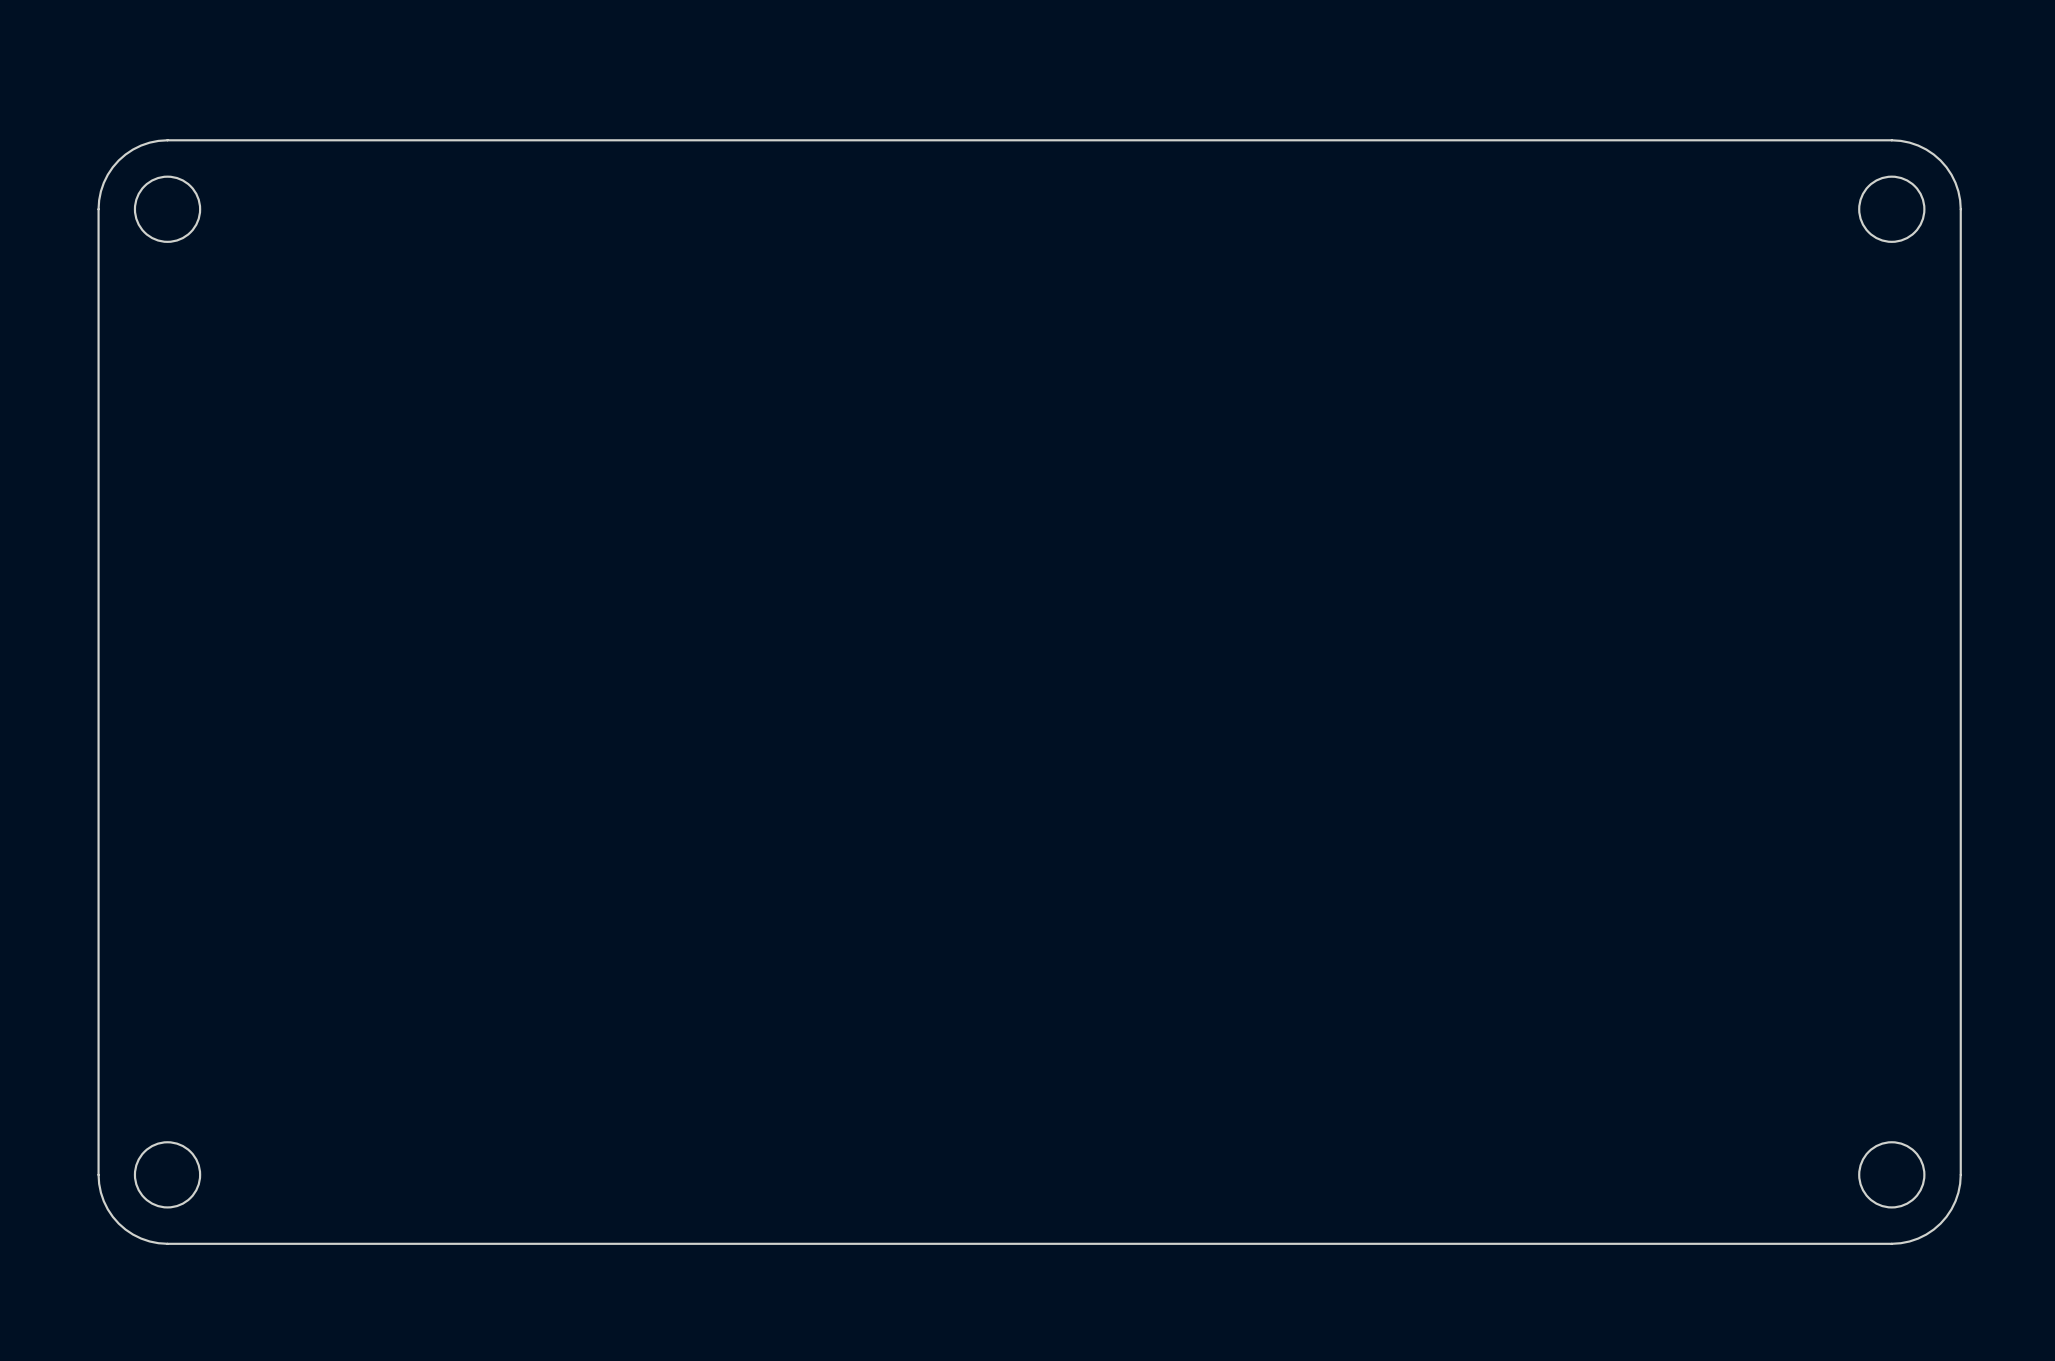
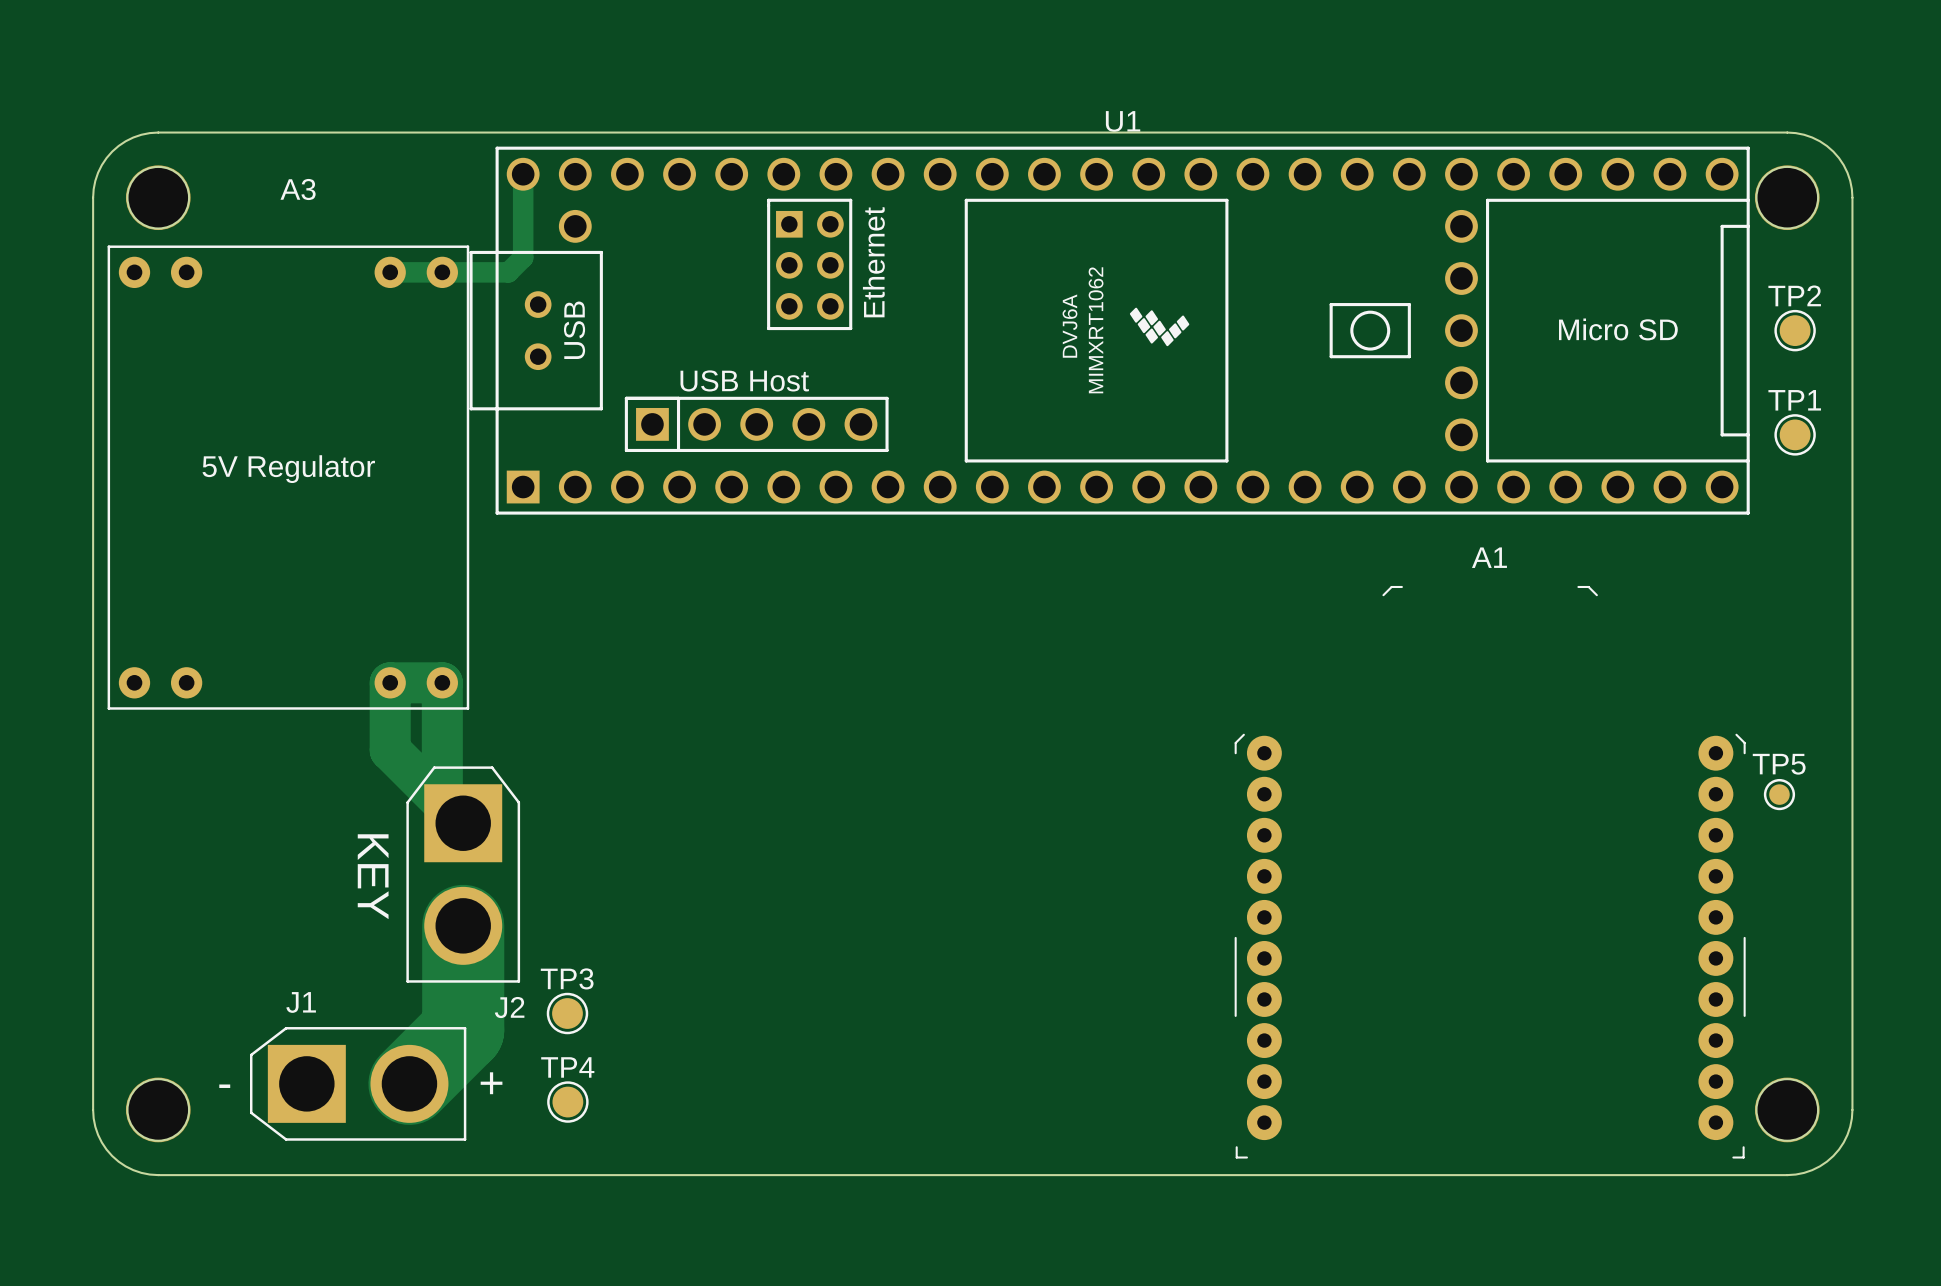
track: none -> (523, 174) (523, 257) (508, 272) (390, 272)
via: none -> (158, 197)
via: none -> (1787, 197)
U1: none -> (1109, 330)
TP2: none -> (1795, 330)
TP1: none -> (1795, 434)
A3: none -> (288, 477)
TP5: none -> (1779, 794)
track: none -> (442, 802) (442, 682) (390, 682) (390, 750) (463, 823)
A1: none -> (1490, 872)
J2: none -> (463, 874)
text: none -> KEY (373, 876)
track: none -> (463, 925) (463, 1030) (409, 1083)
TP3: none -> (567, 1013)
J1: none -> (358, 1083)
TP4: none -> (567, 1102)
via: none -> (158, 1109)
via: none -> (1787, 1109)

